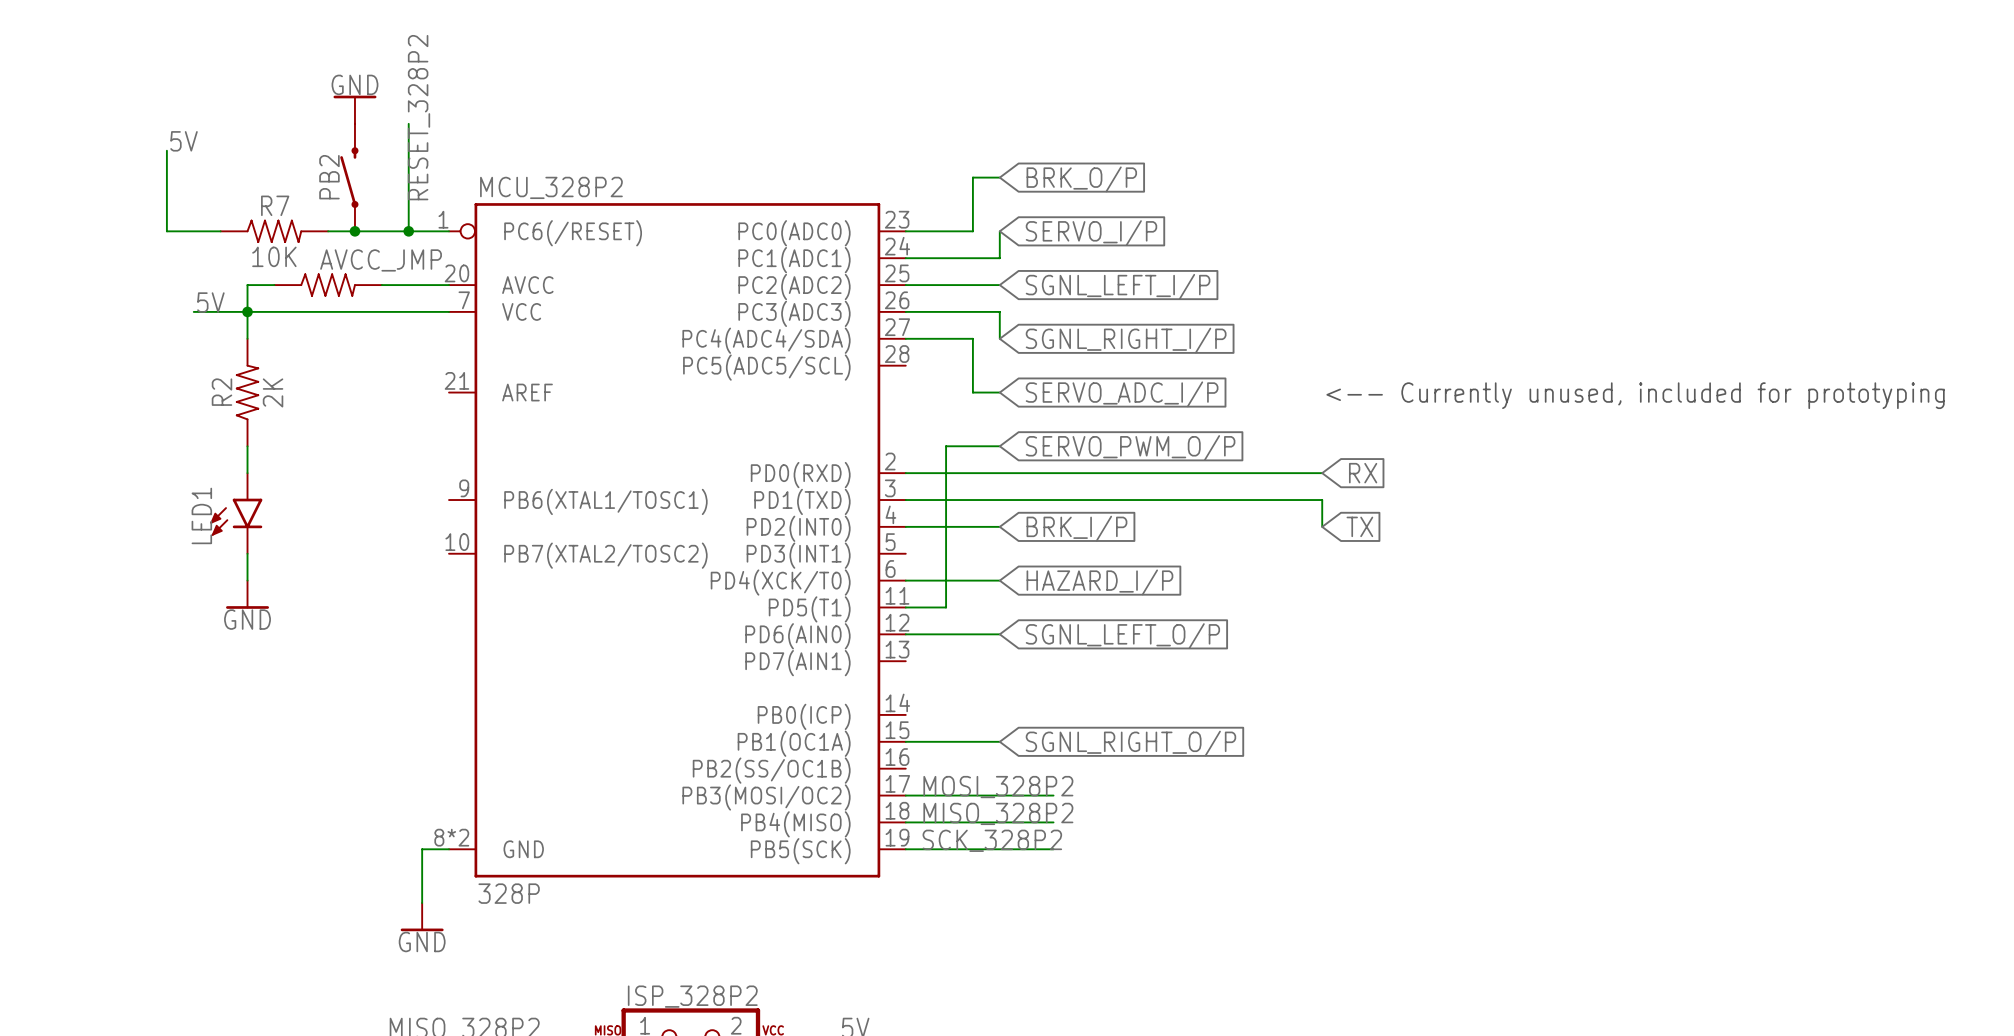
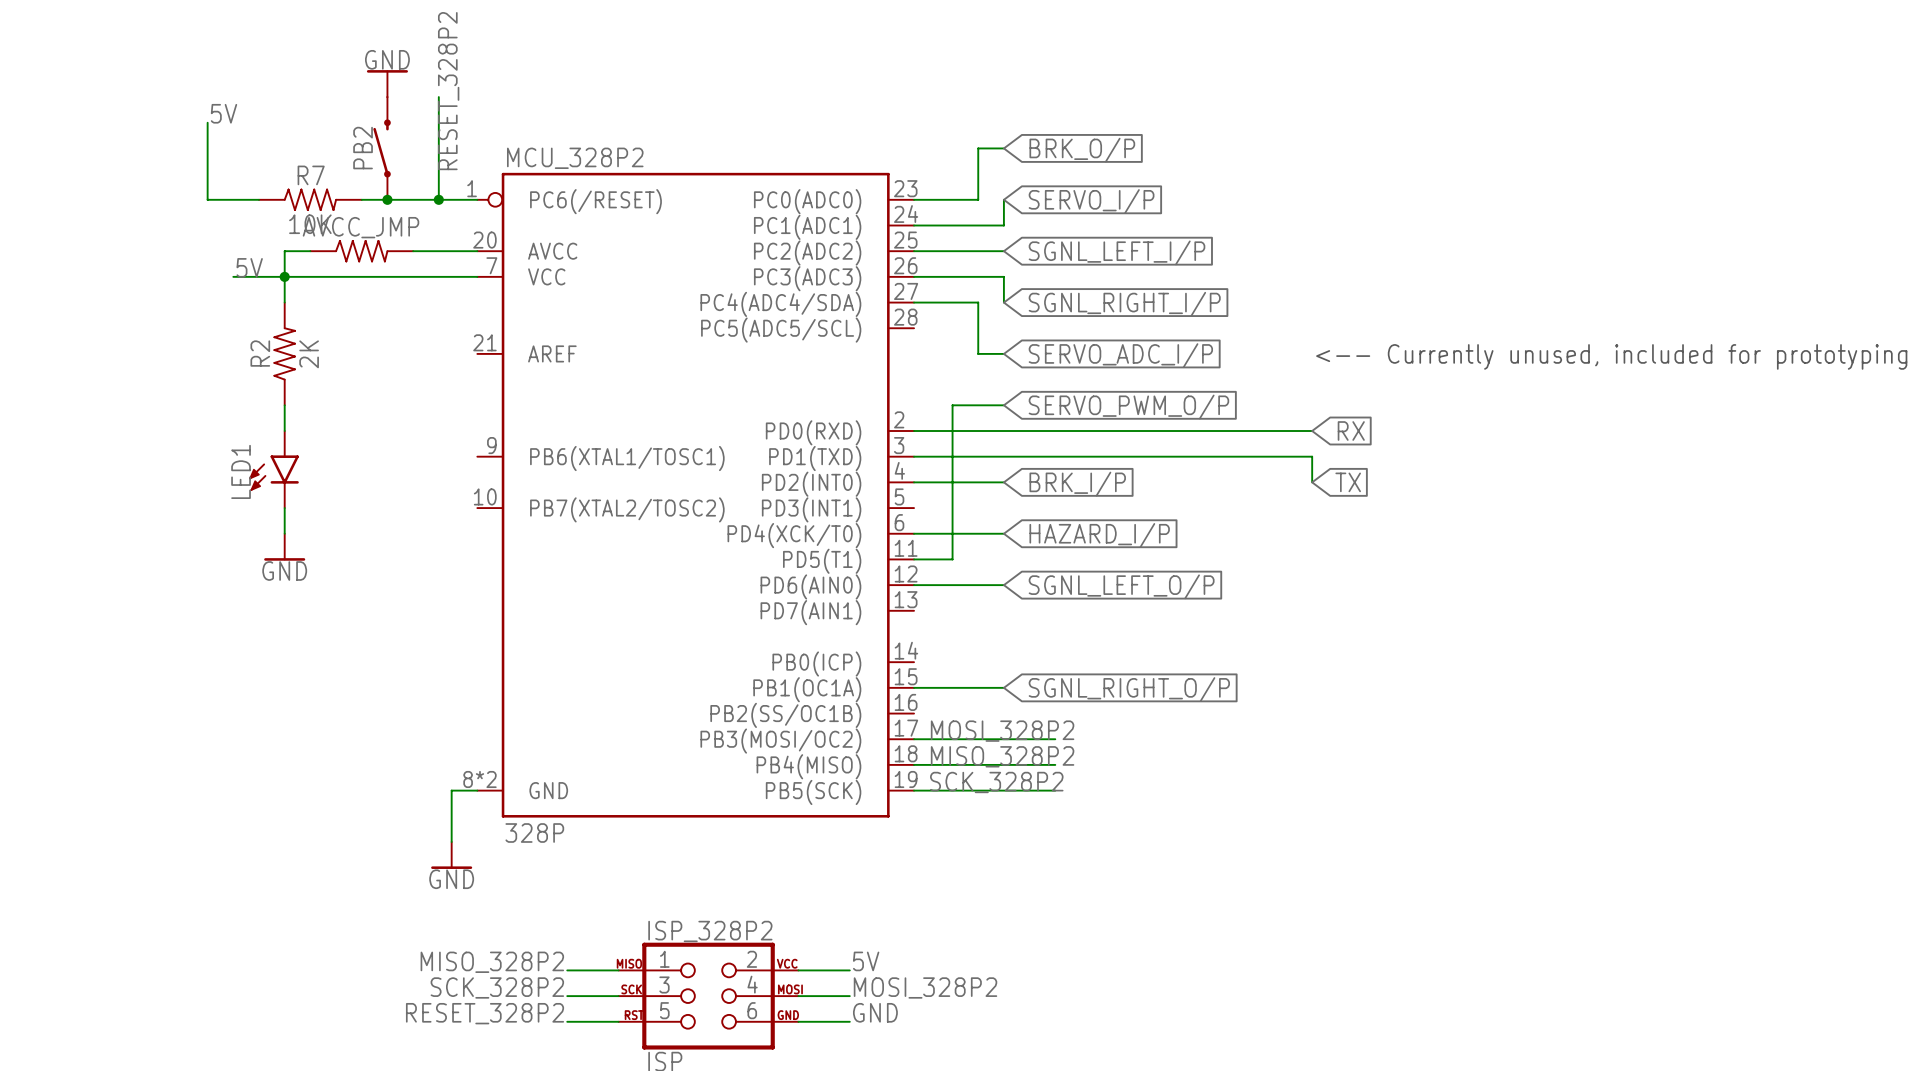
AVCC_JMP name position: AVCC_JMP (381, 260) -> AVCC_JMP (360, 227)

